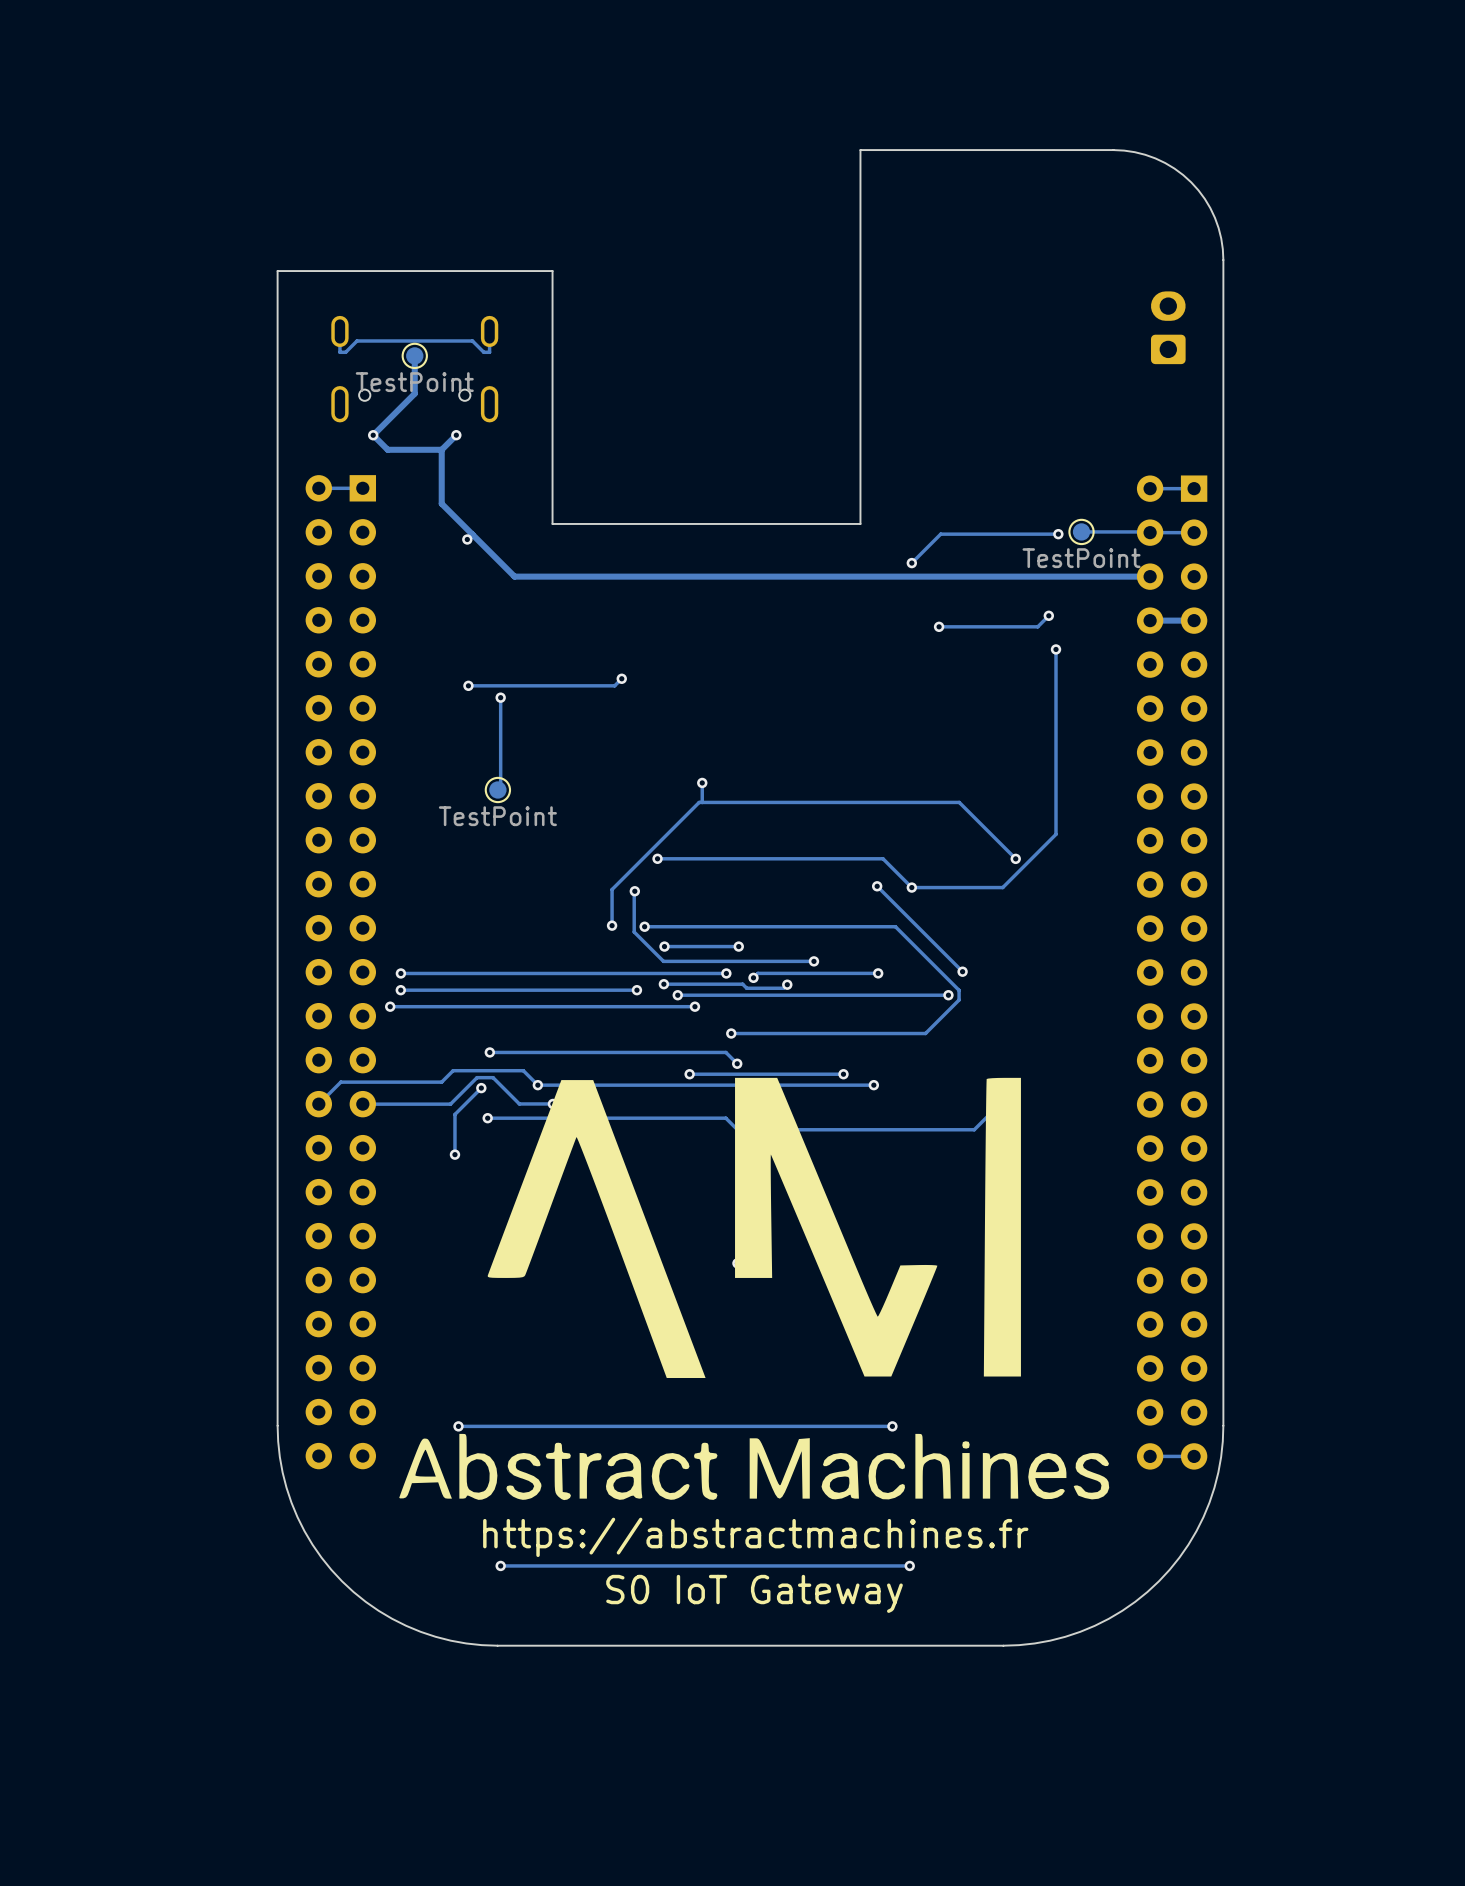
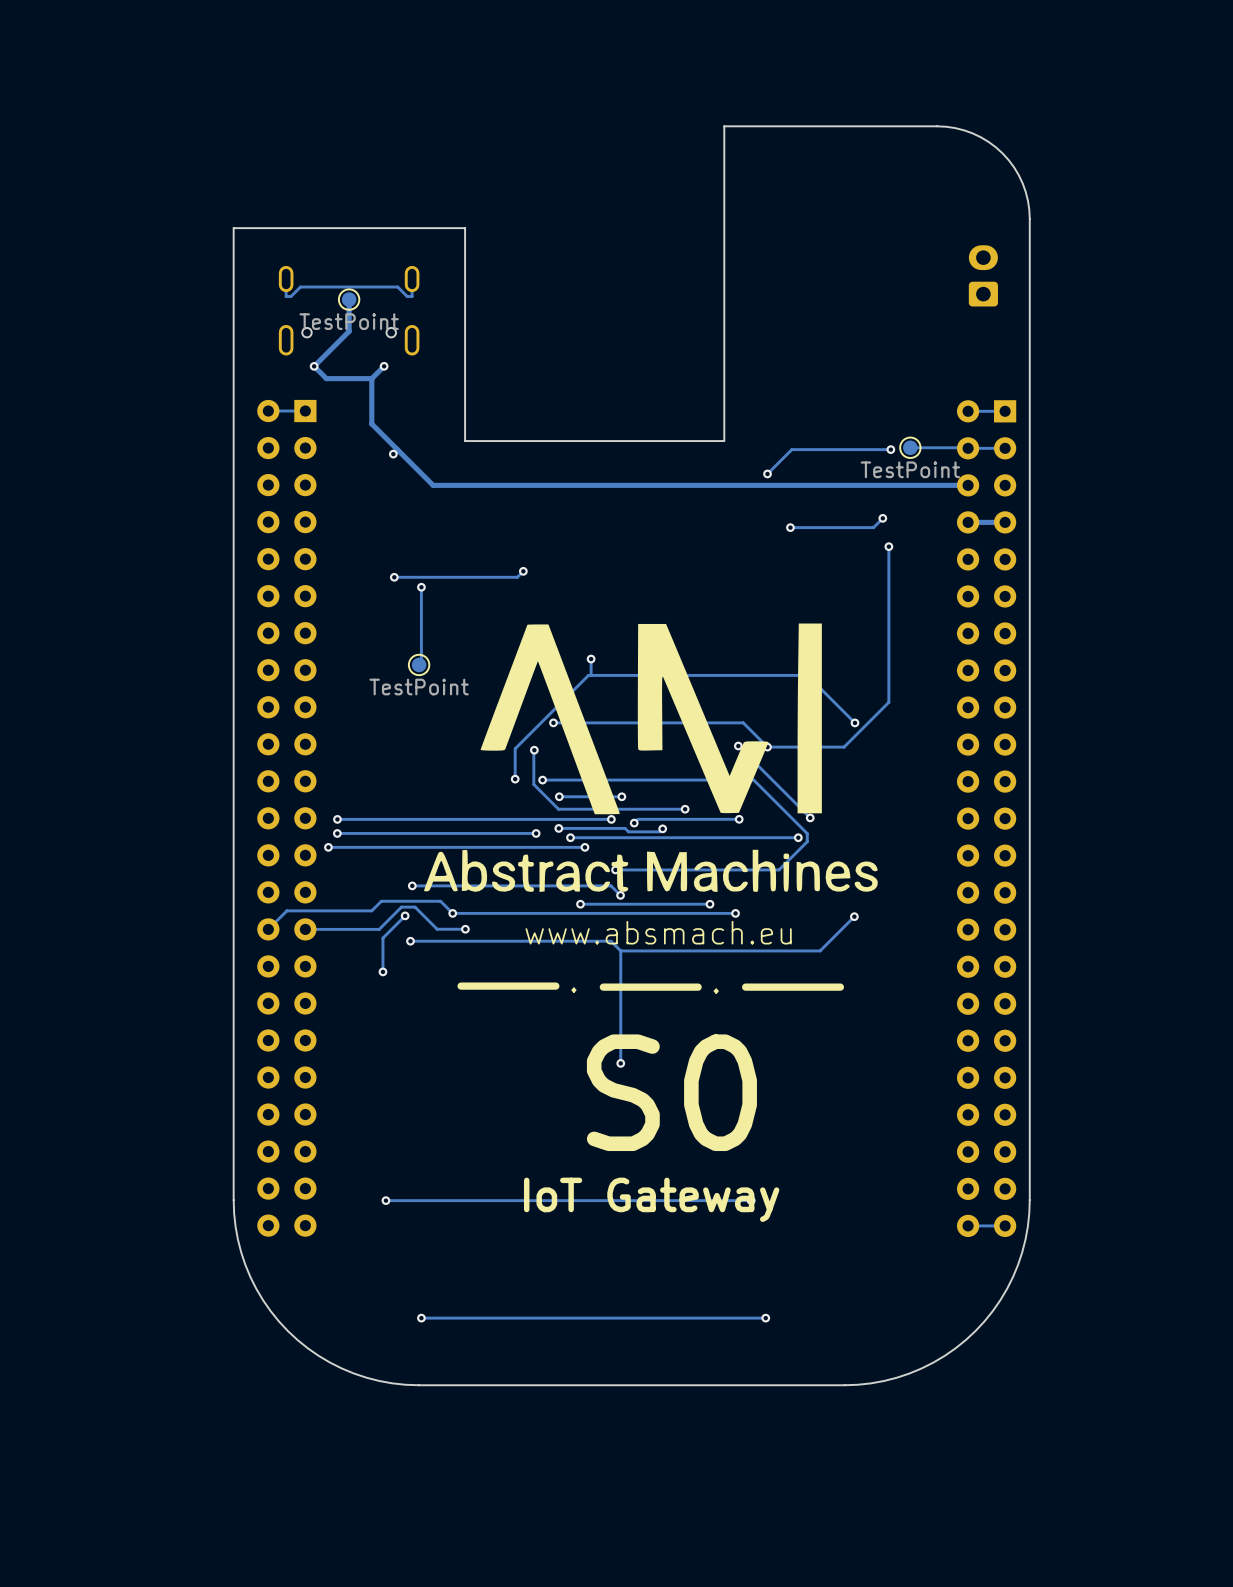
drawing: none -> [424, 623, 878, 892]
drawing: [399, 1077, 1110, 1501] -> none
text: none -> www.absmach.eu (658, 932)
line: none -> (555, 986) (461, 986)
line: none -> (698, 987) (603, 987)
line: none -> (840, 987) (745, 987)
text: none -> . (573, 990)
text: none -> . (716, 991)
text: none -> S0 (671, 1092)
text: none -> IoT Gateway (651, 1199)
text: https://abstractmachines.fr (755, 1537) -> none
text: S0 IoT Gateway (754, 1593) -> none

